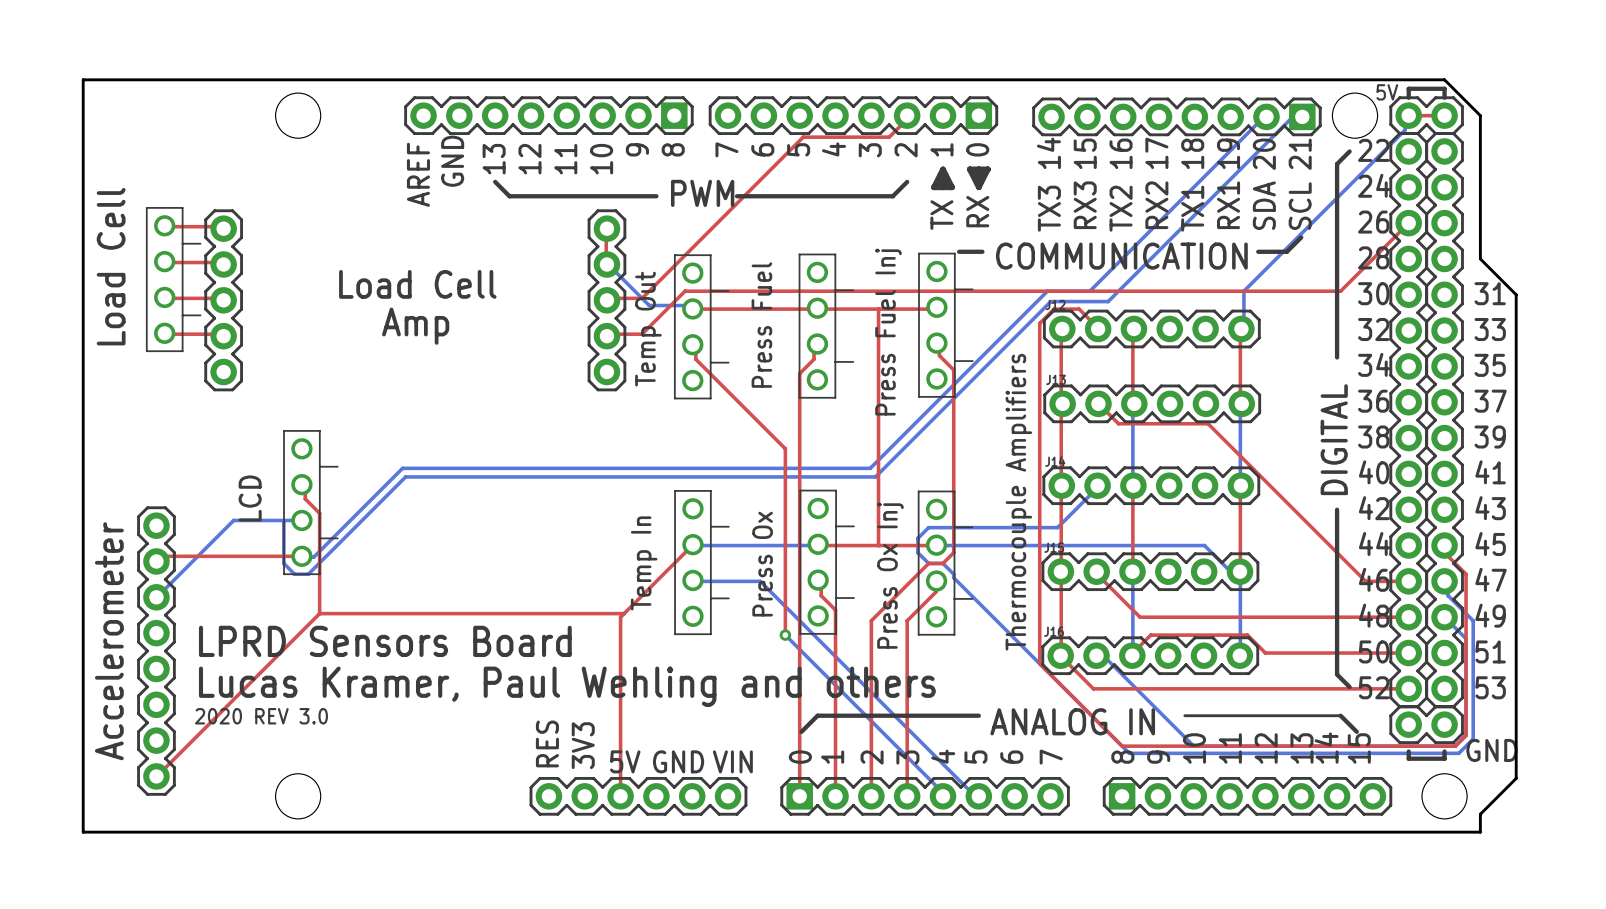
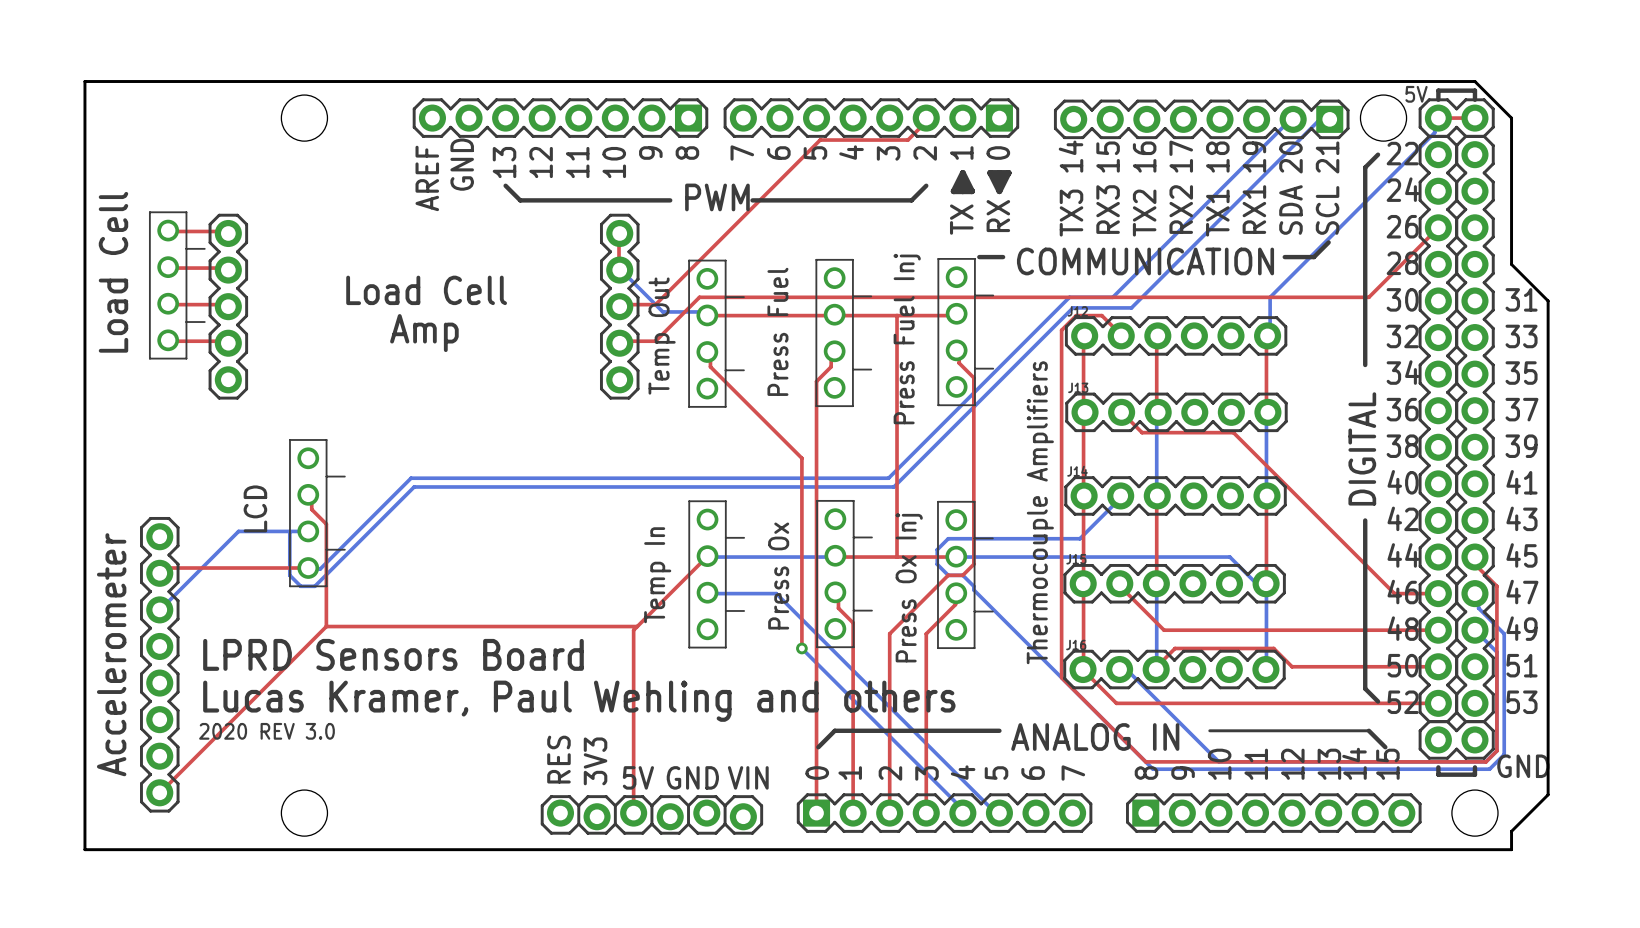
part footprint: [529, 776, 748, 816] -> [540, 795, 764, 835]

